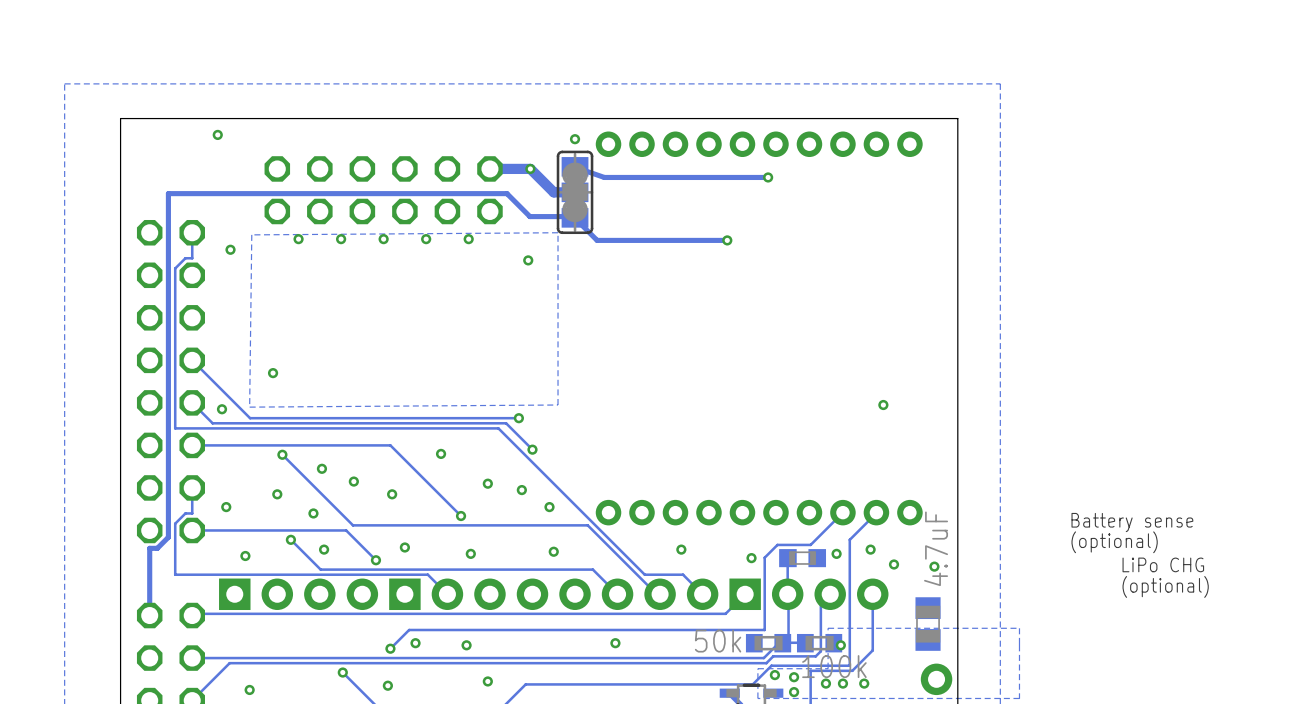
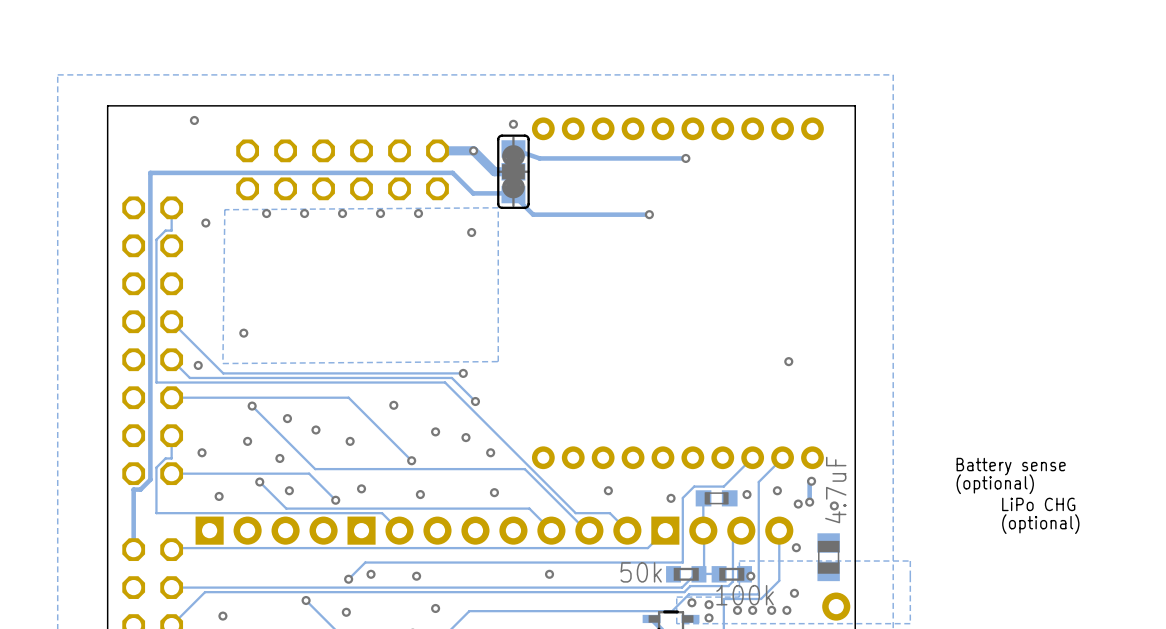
track: none -> (811, 481) (809, 481) (809, 502)
via: none -> (811, 481)
via: none -> (809, 502)
via: none -> (796, 547)
via: none -> (794, 593)
via: none -> (786, 610)

